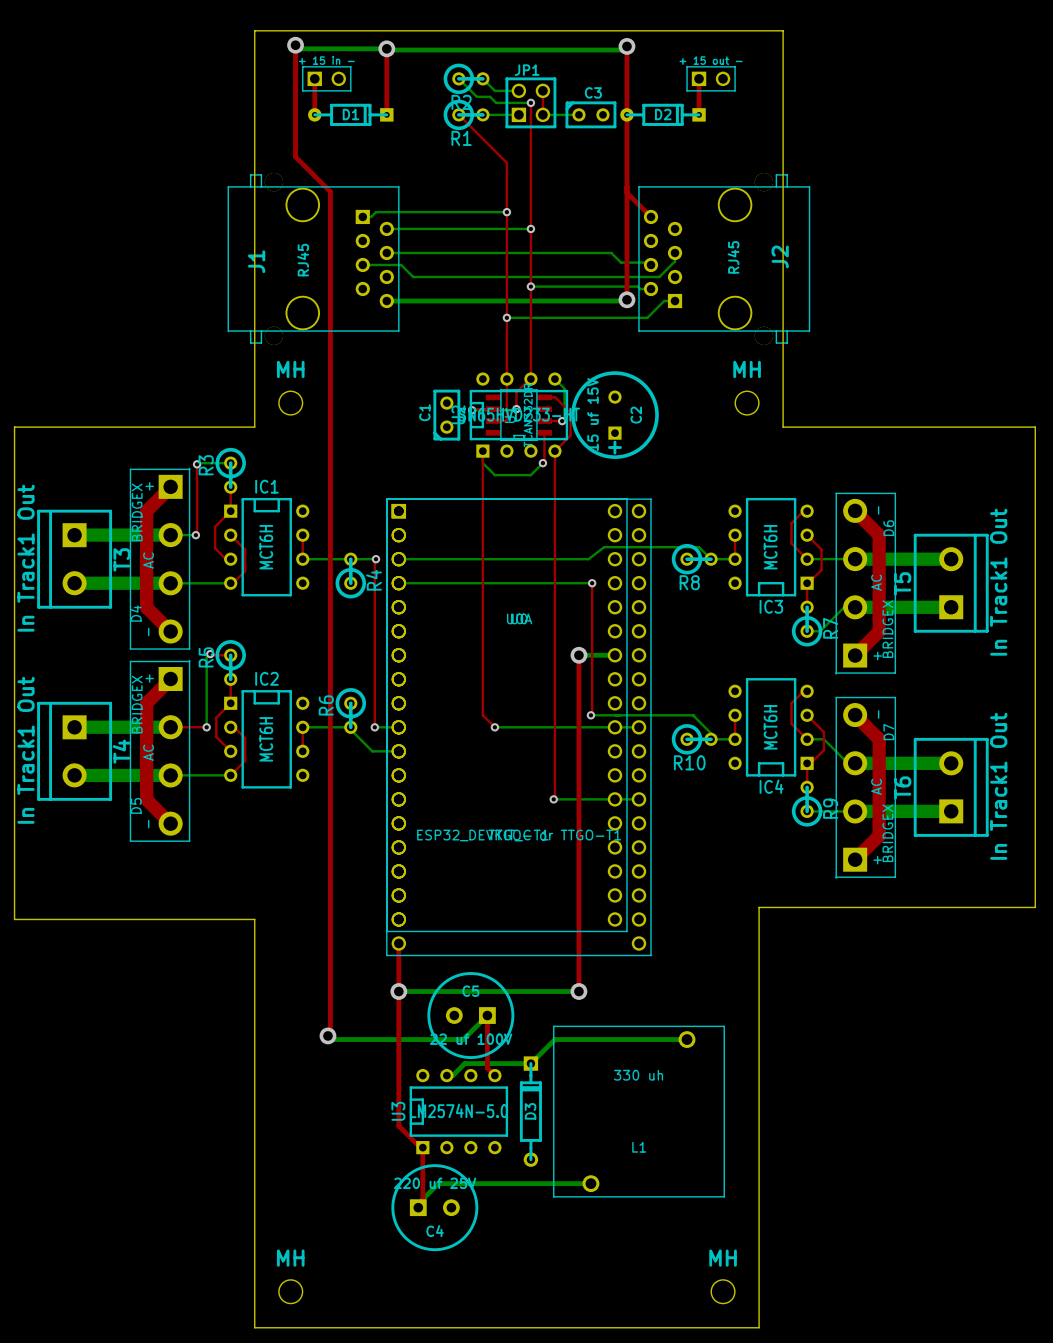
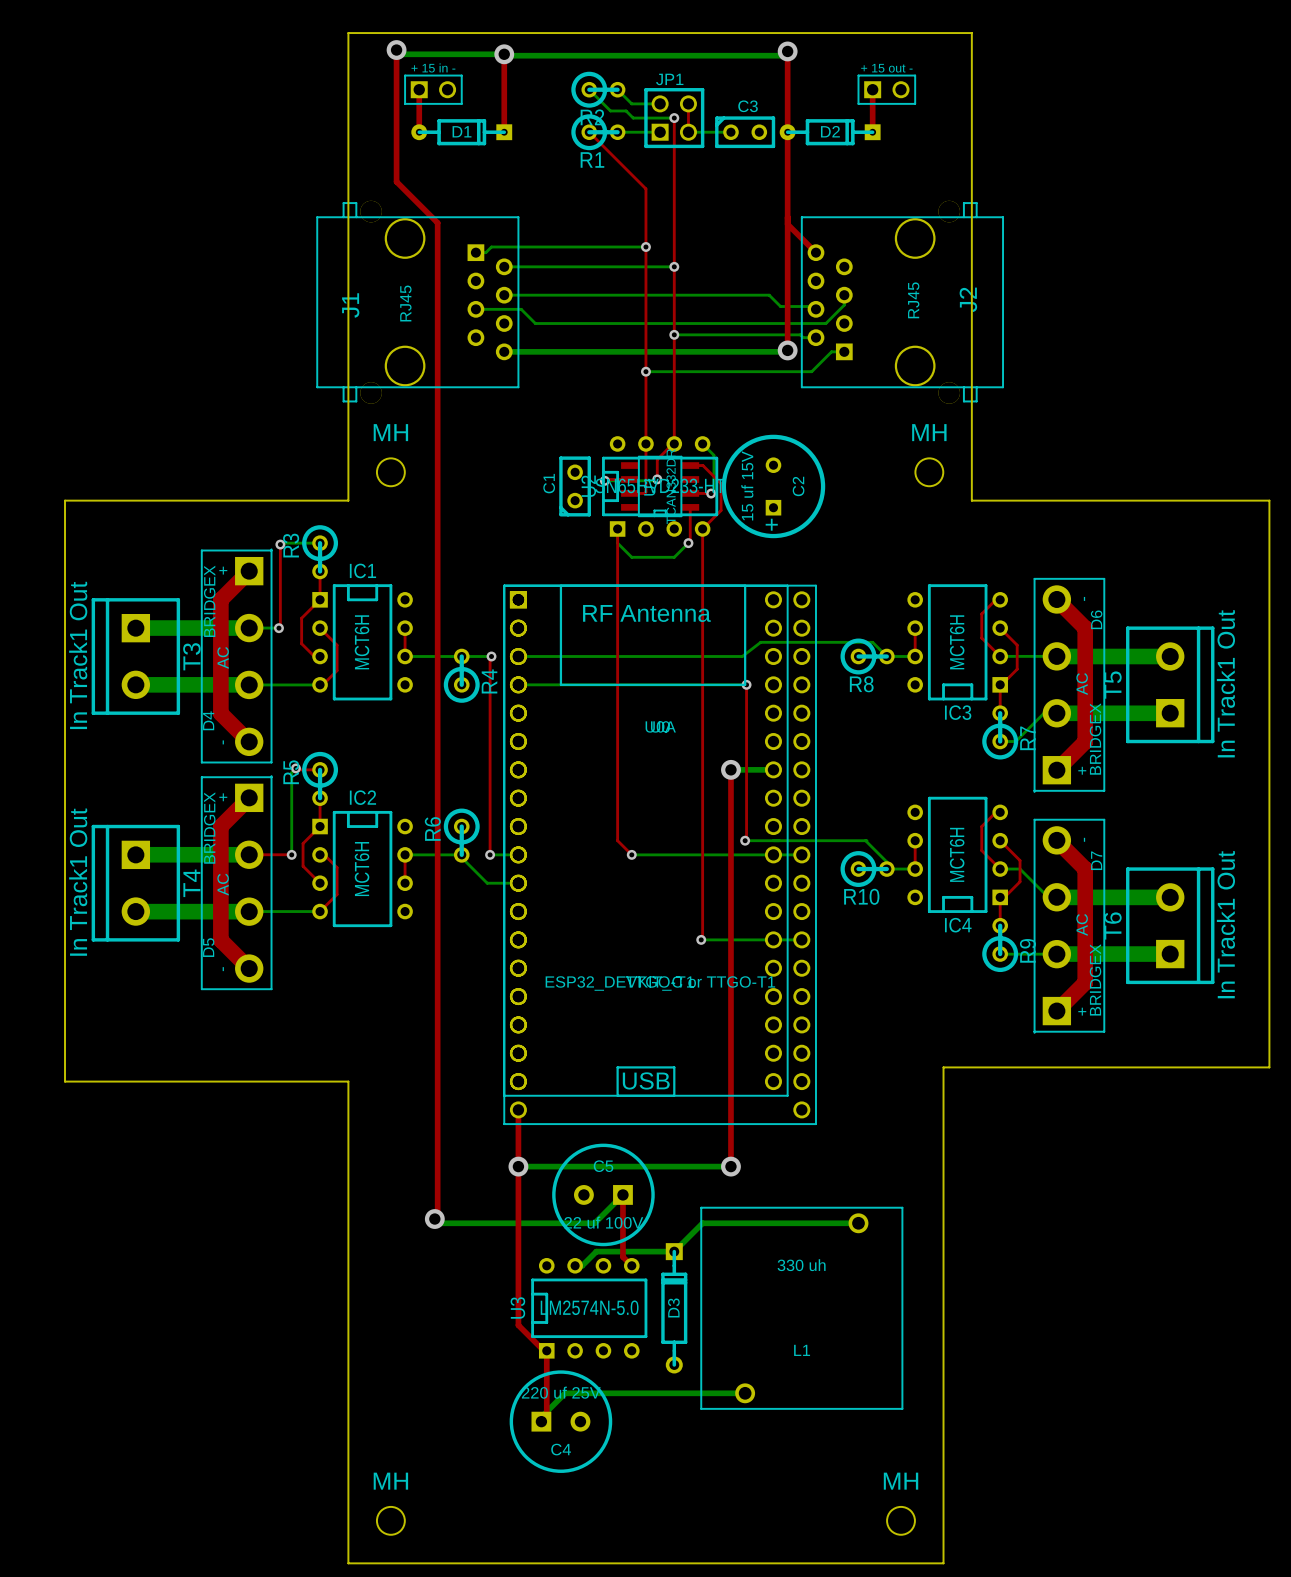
line: none -> (560, 585) (560, 684) (745, 684) (745, 585) (560, 585)
text: none -> RF Antenna (646, 613)
line: none -> (617, 1067) (674, 1067) (674, 1095) (617, 1095) (617, 1067)
text: none -> USB (646, 1080)

